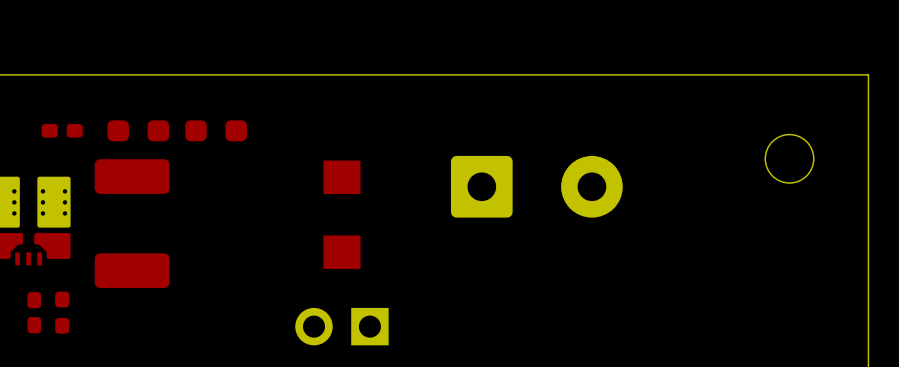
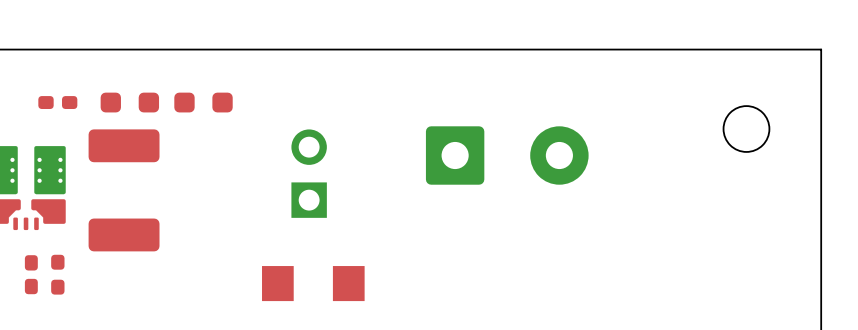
part footprint: [323, 160, 361, 269] -> [291, 129, 327, 218]
part footprint: [295, 307, 389, 346] -> [262, 266, 365, 302]

